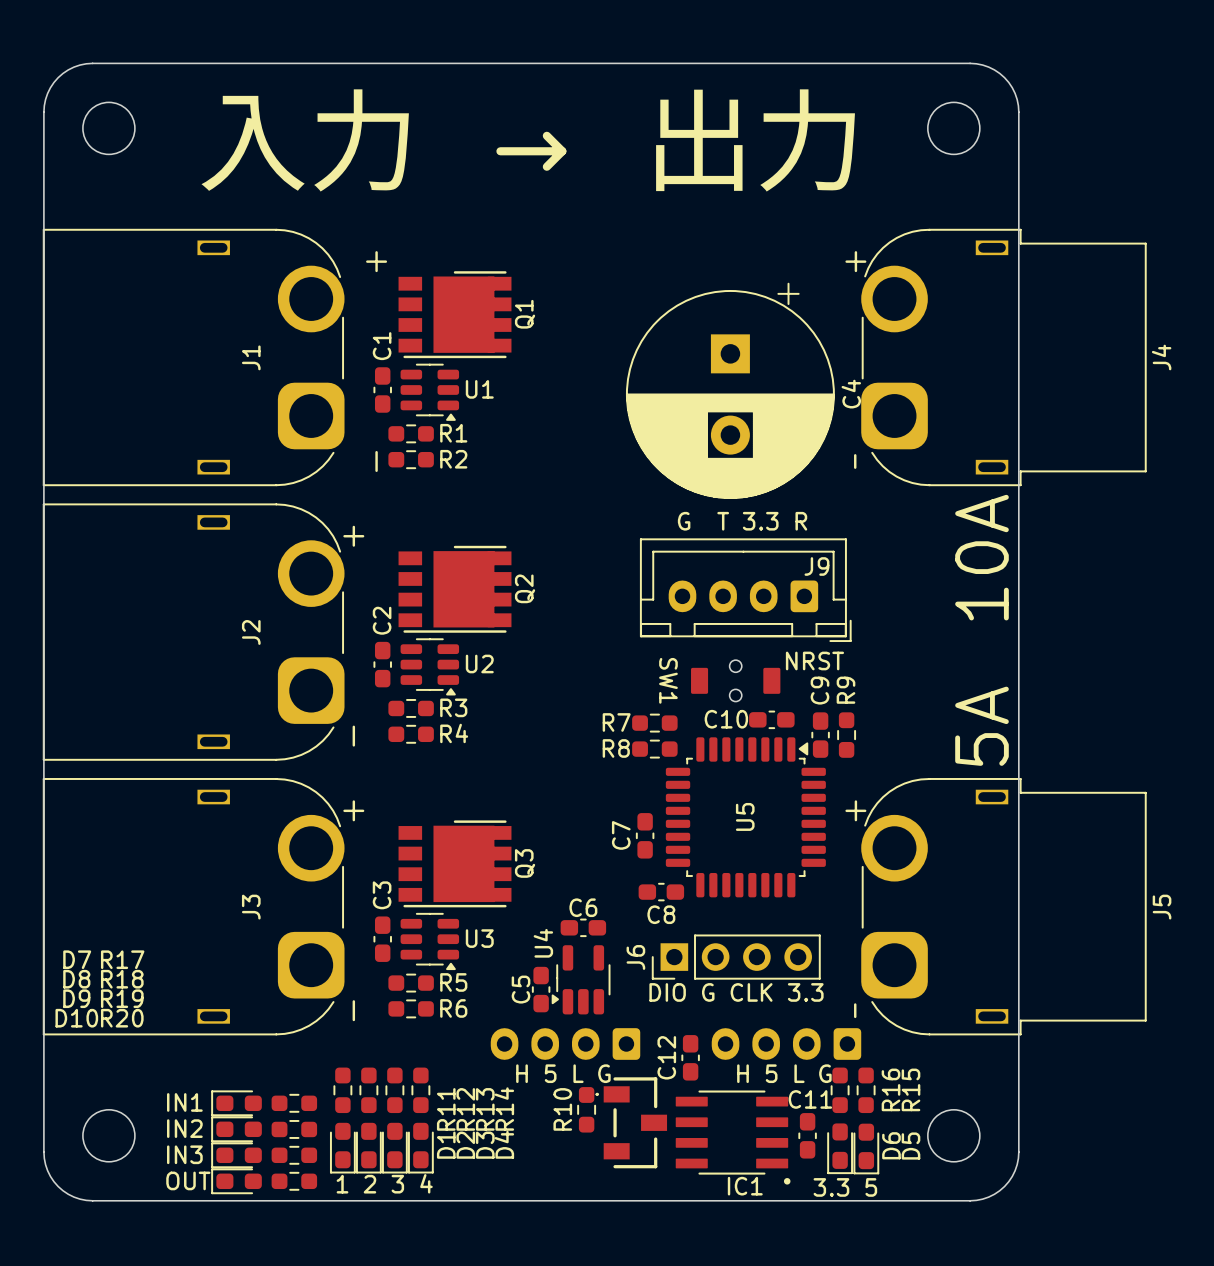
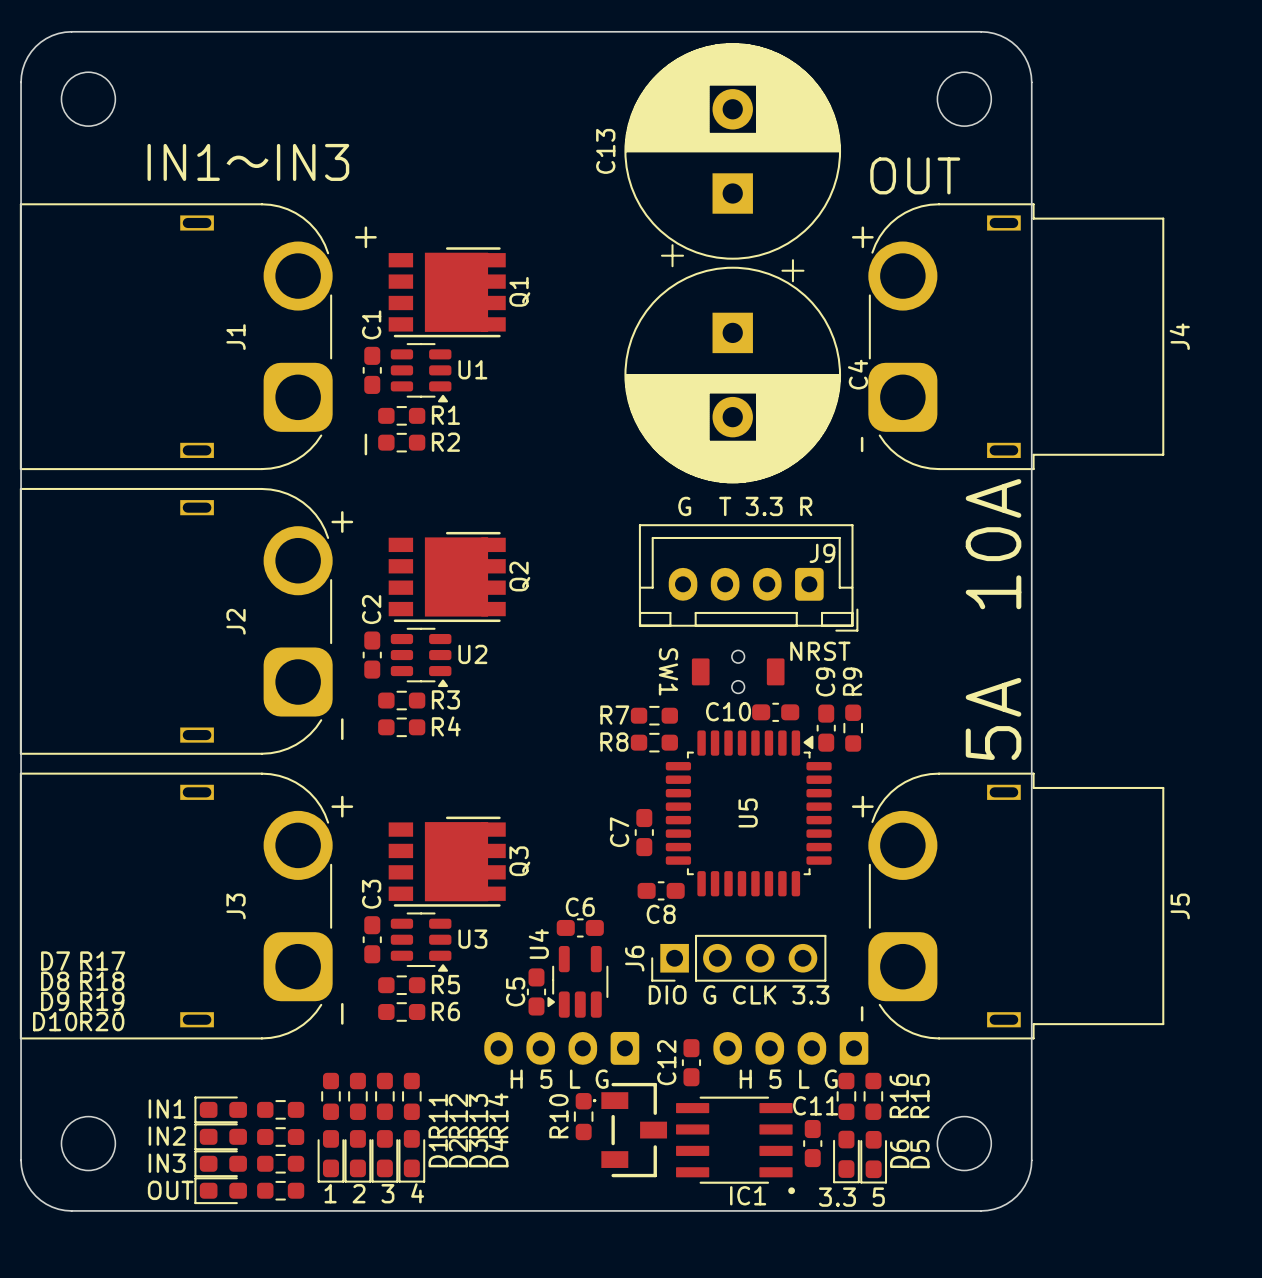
text: 入力 → 出力 (528, 140) -> none
C13: none -> (732, 155)
text: none -> IN1〜IN3 (248, 162)
text: none -> OUT (915, 175)

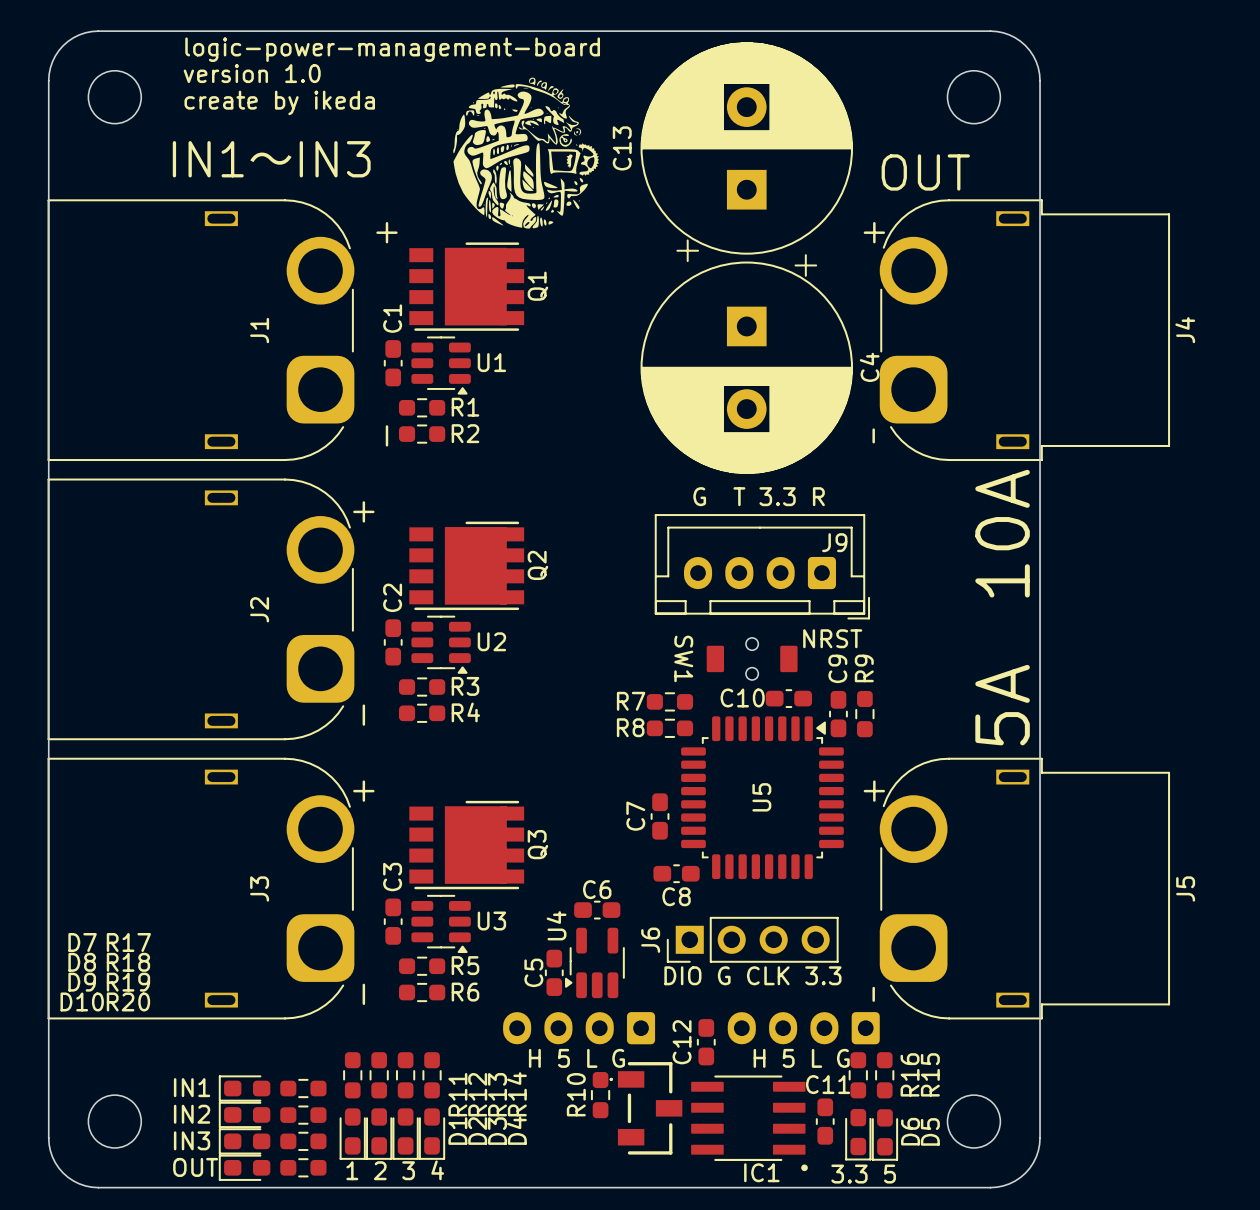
text: none -> logic-power-management-board (392, 49)
text: none -> version 1.0 (252, 73)
drawing: none -> [453, 77, 600, 229]
text: none -> create by ikeda (279, 102)

